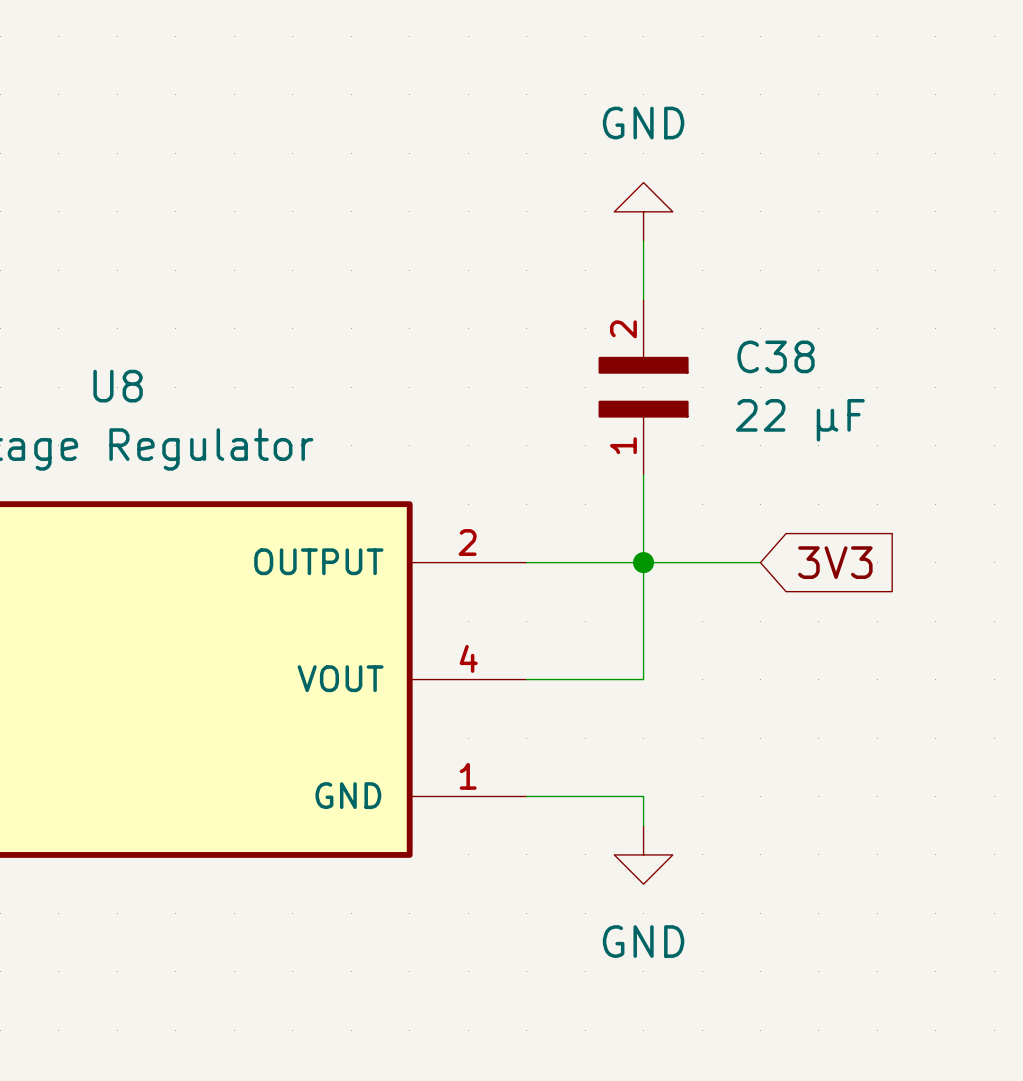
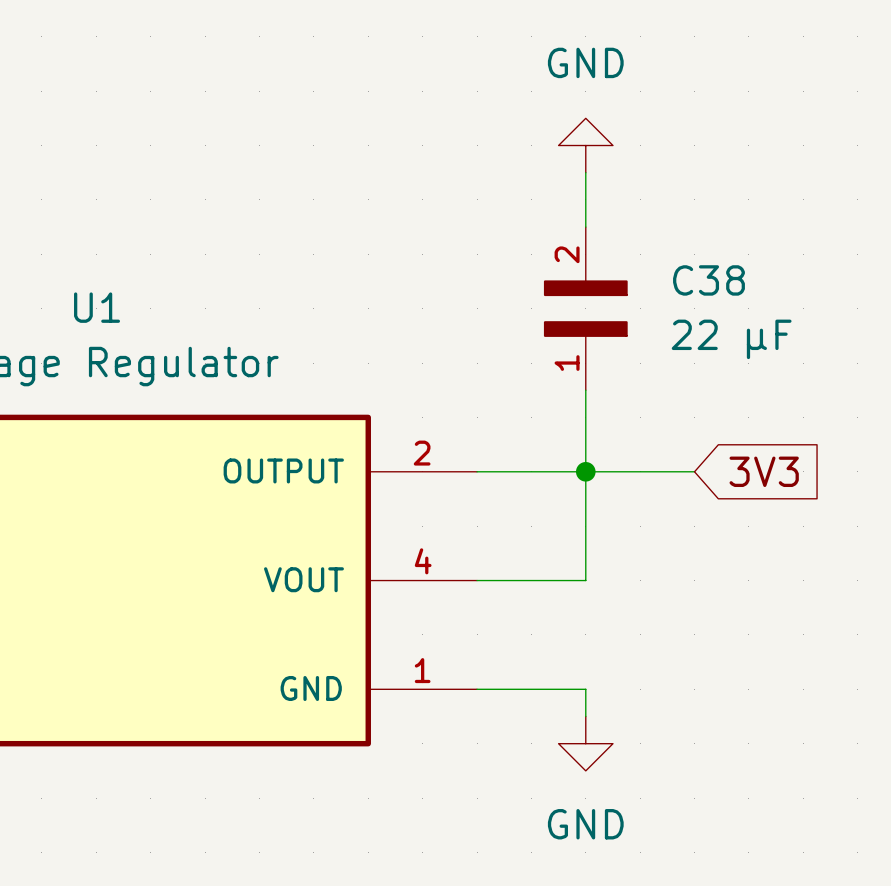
U8 name: U8 (118, 386) -> U1 (97, 307)

